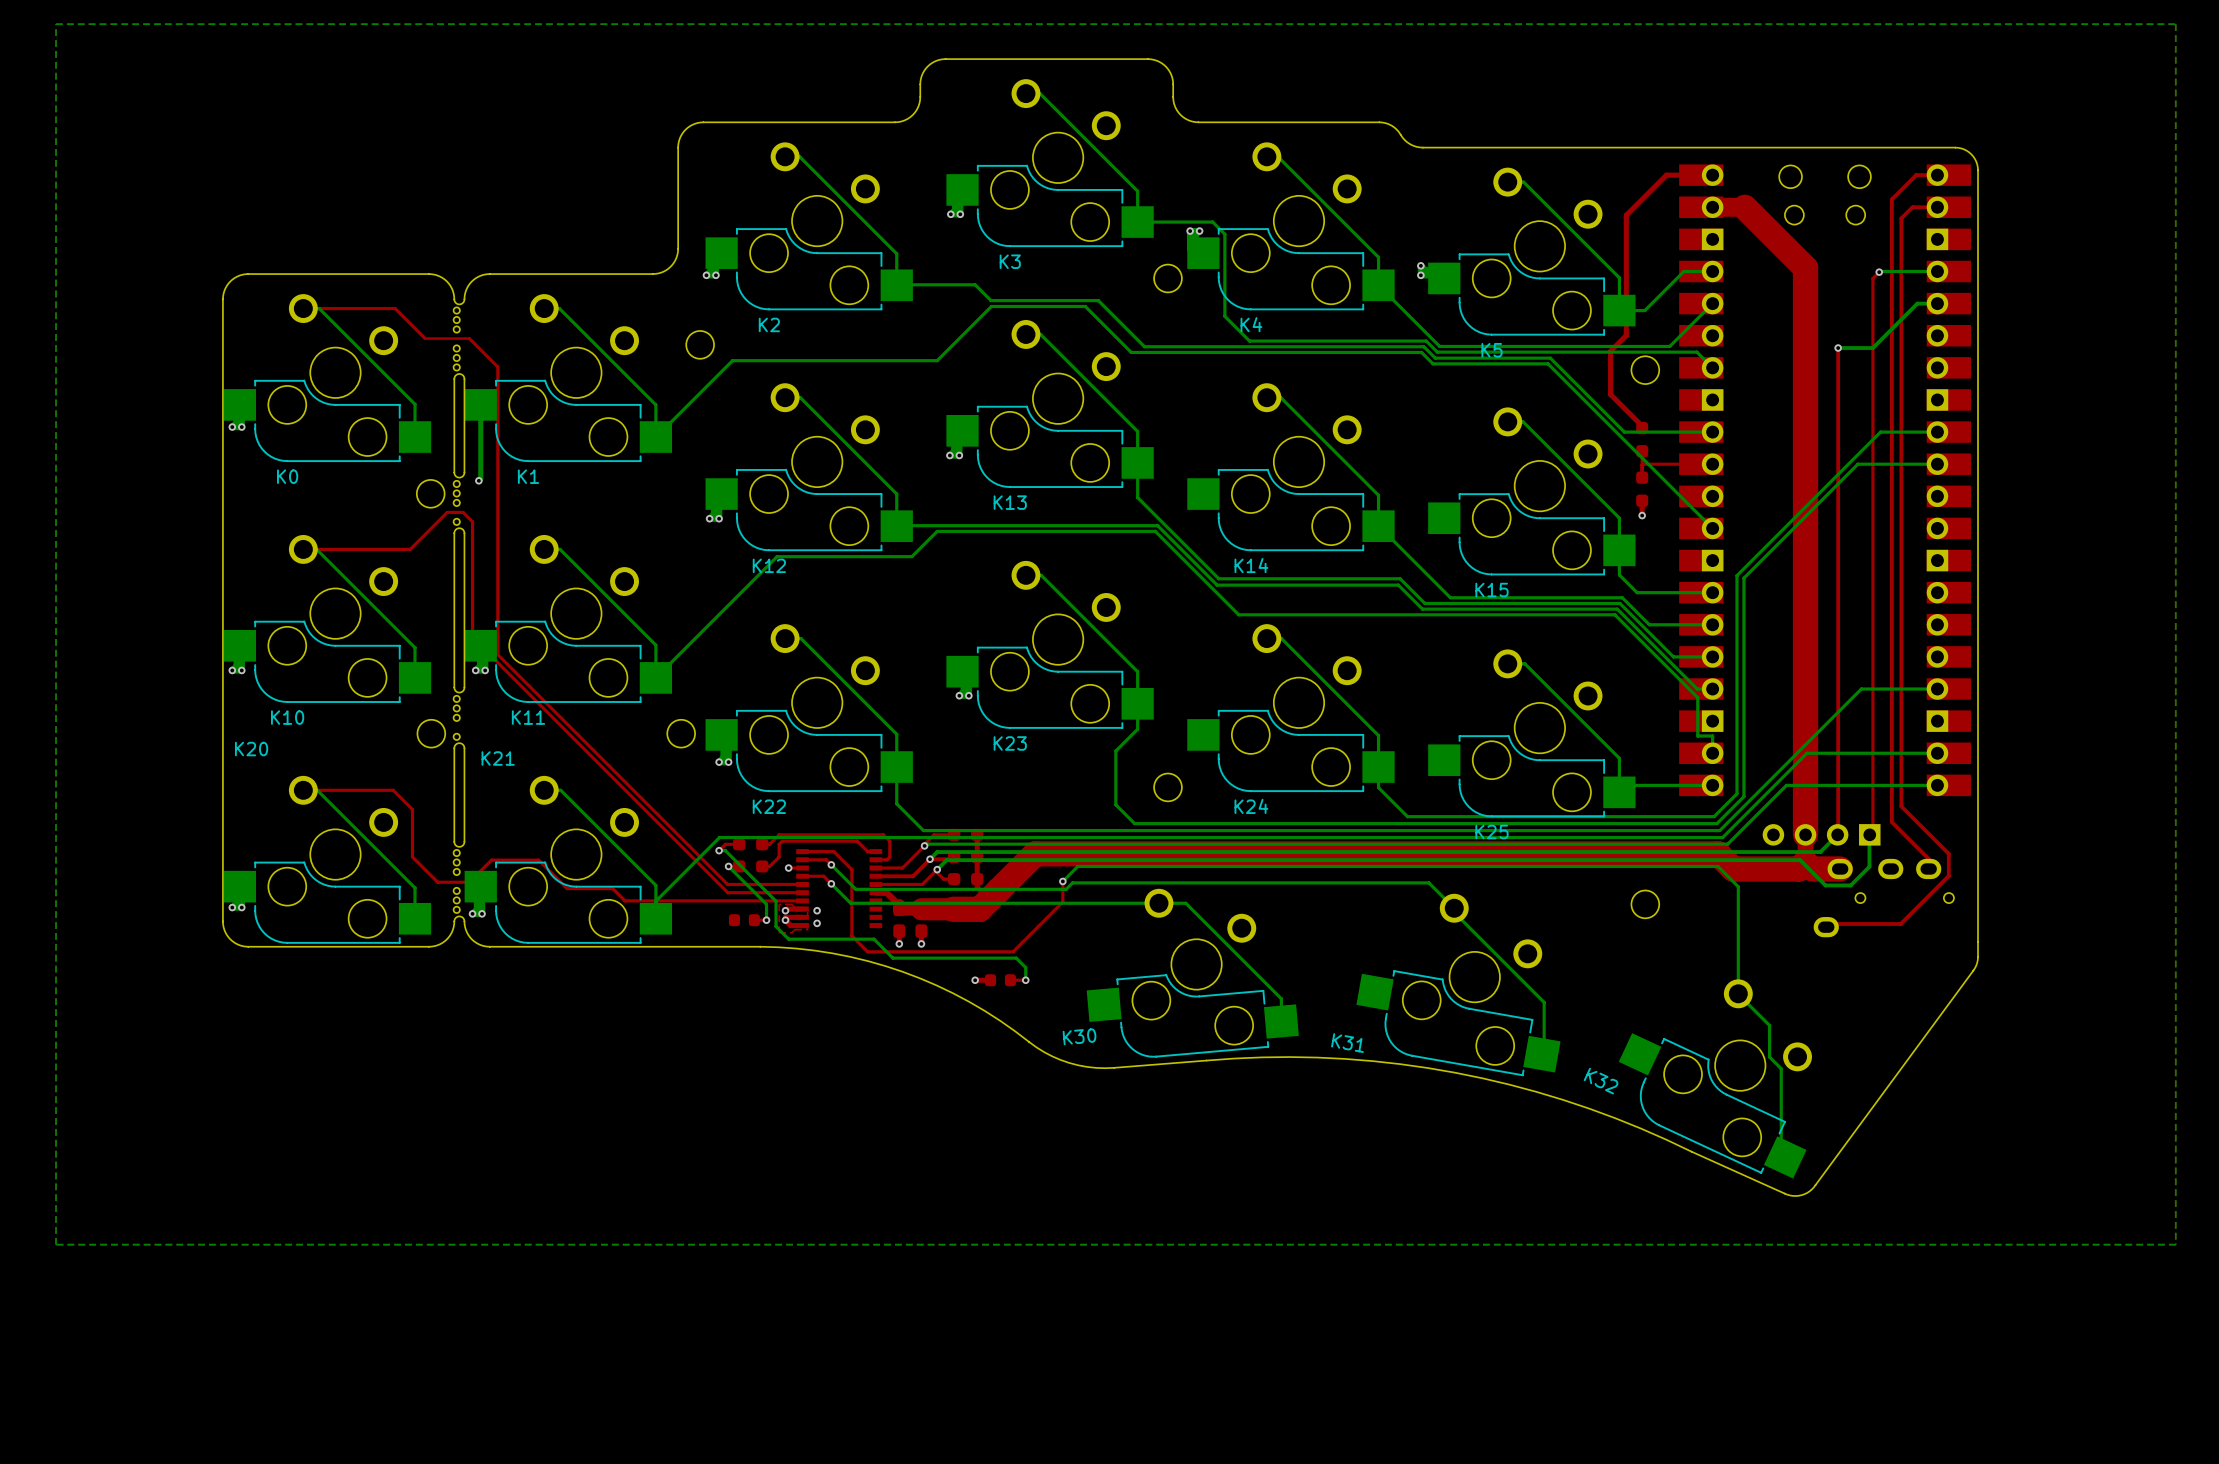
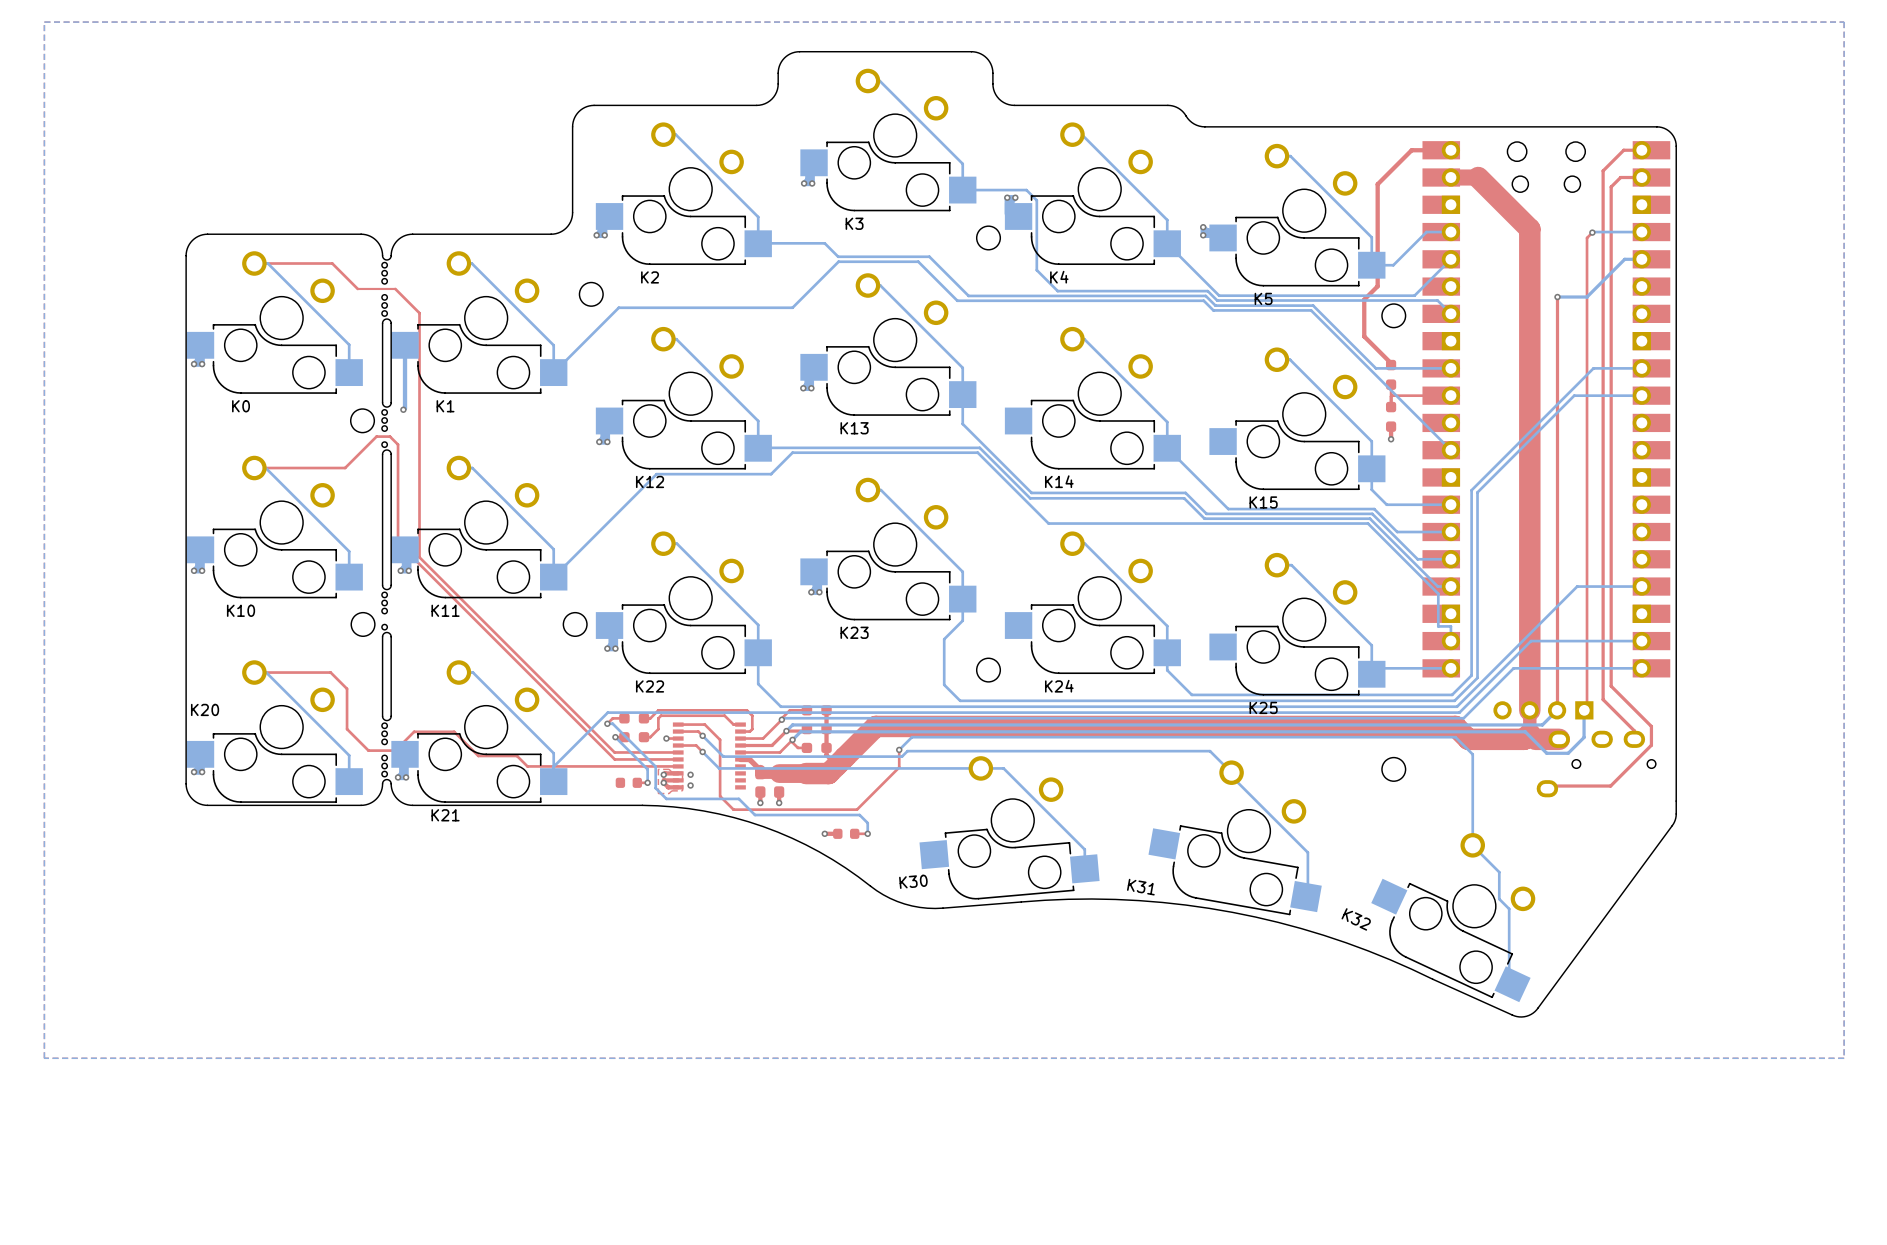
K20 name position: K20 (251, 749) -> K20 (205, 709)
K21 name position: K21 (498, 758) -> K21 (445, 815)

